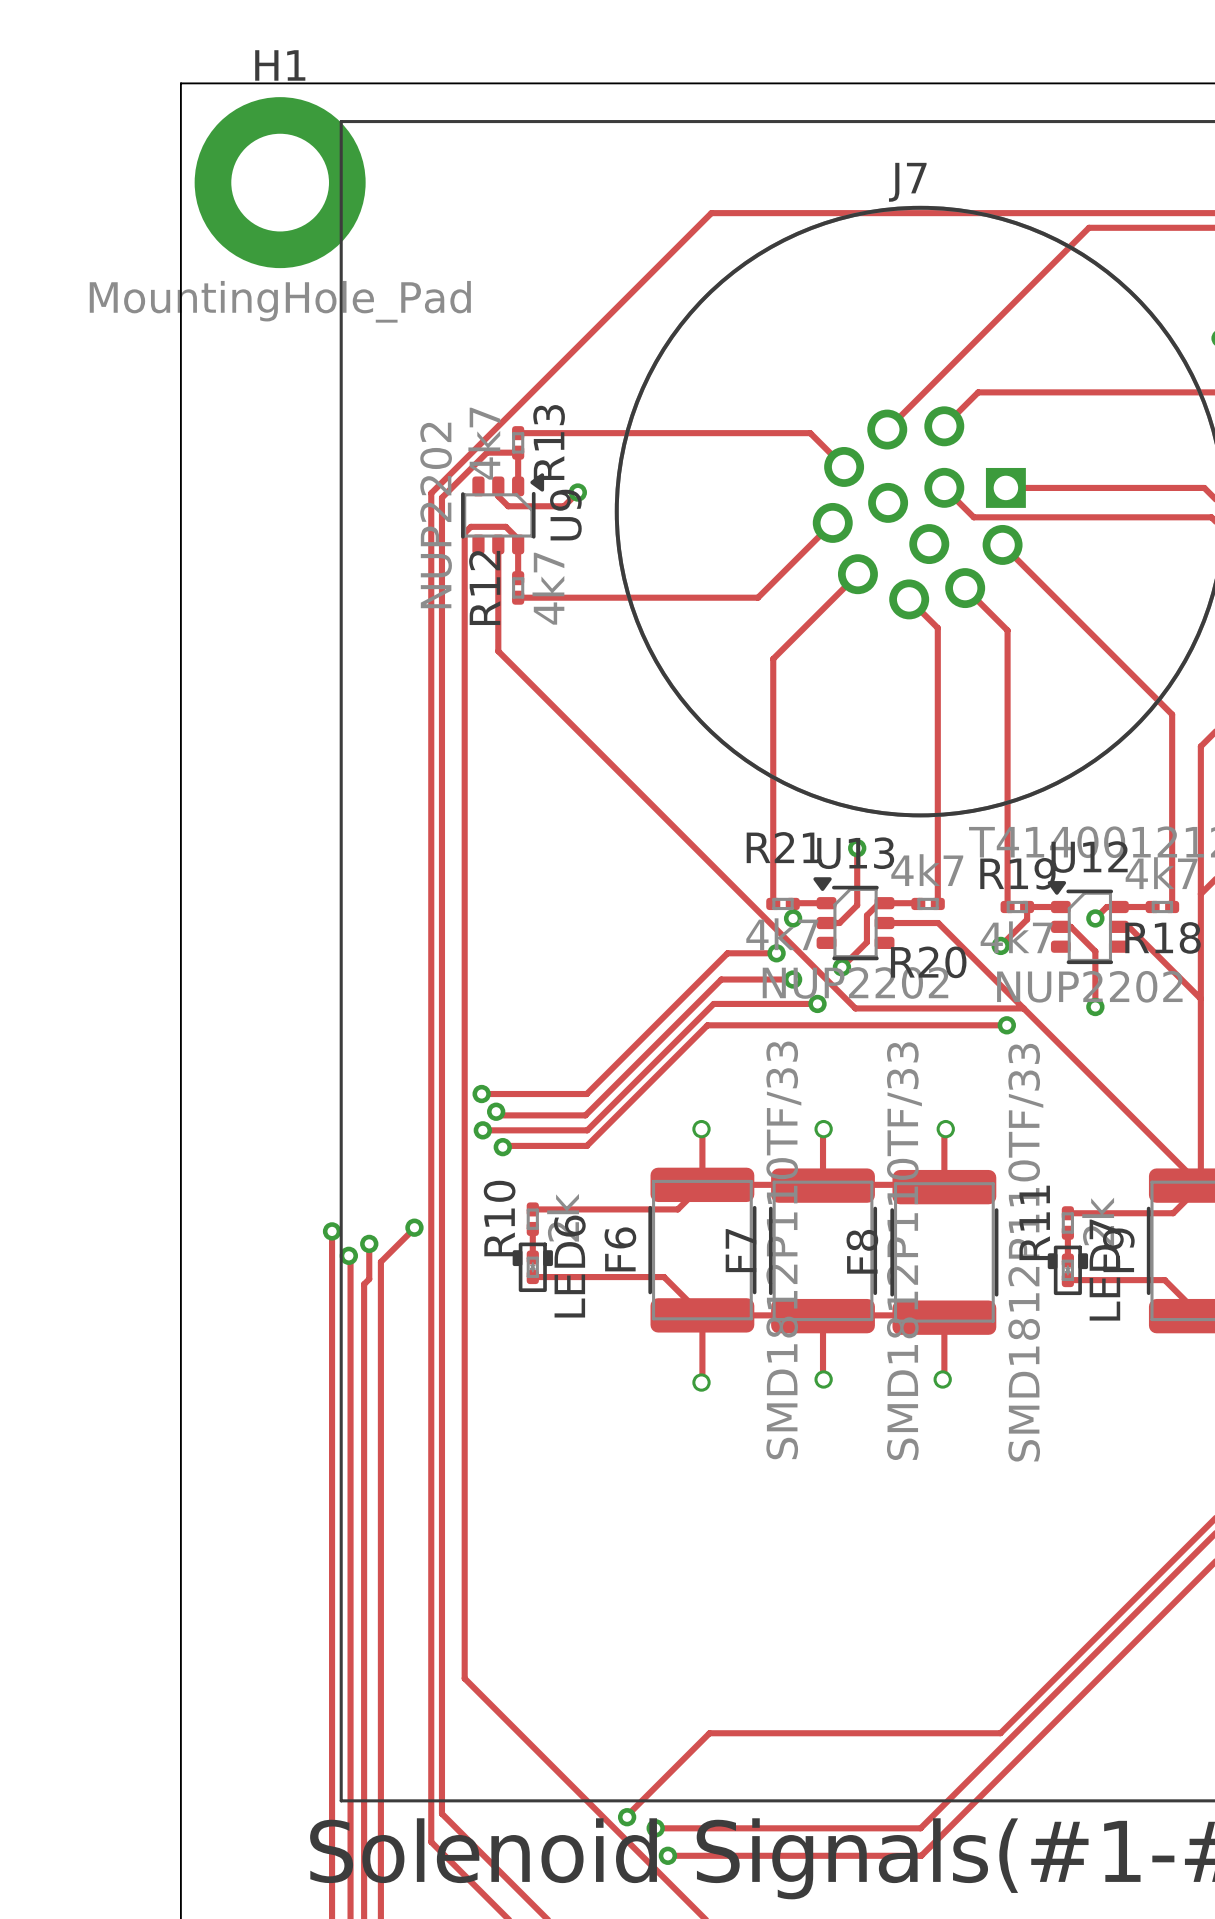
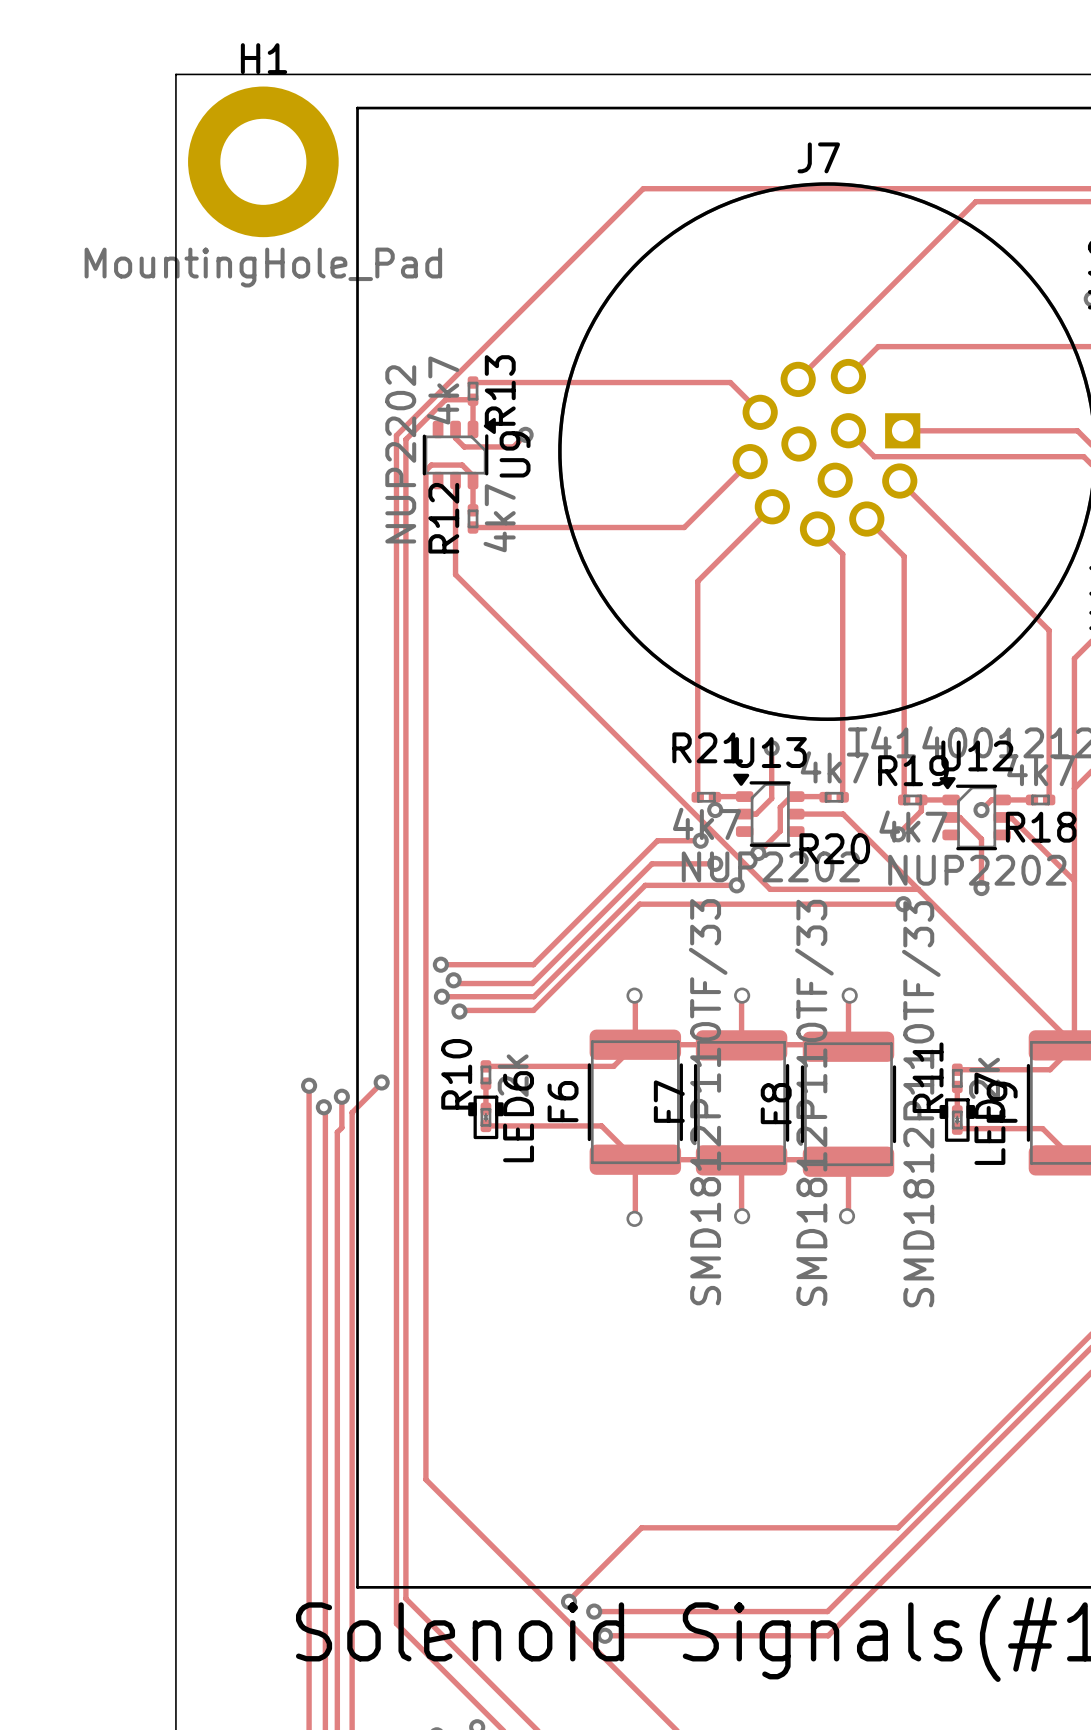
line: (387, 121) (341, 121) (341, 1800) (387, 1800) -> (357, 108) (357, 1587)

